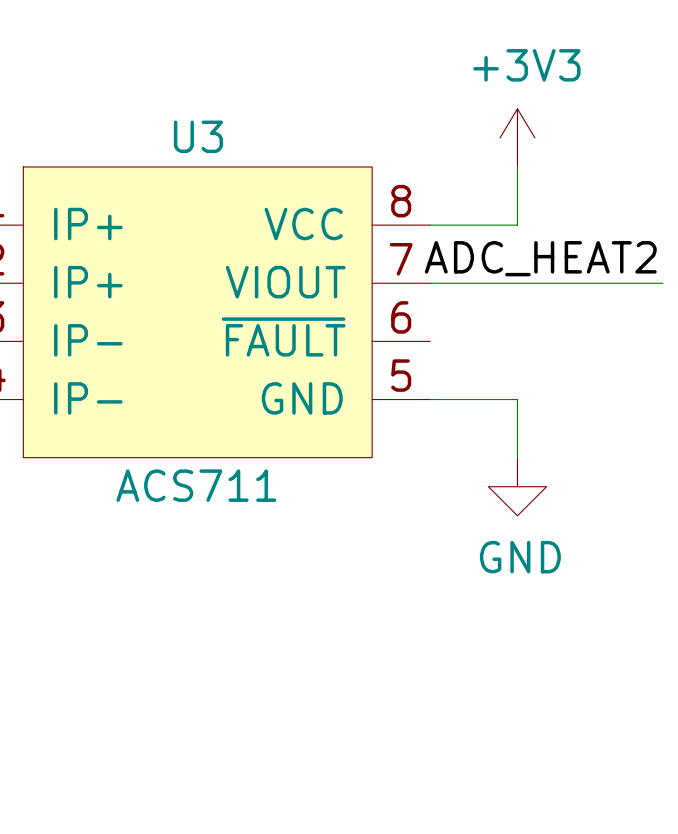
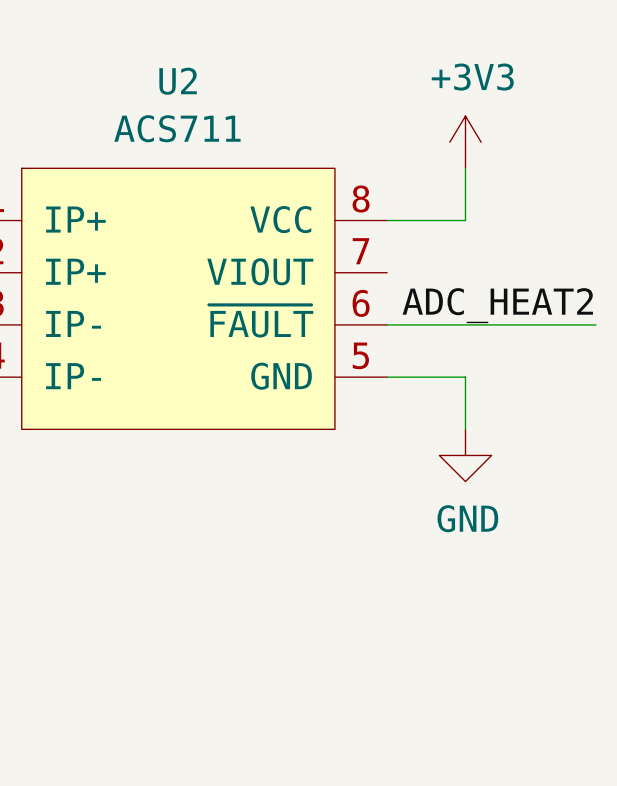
U3 name: U3 (198, 136) -> U2 (178, 81)
label position: ADC_HEAT2 (540, 258) -> ADC_HEAT2 (497, 305)
wire: (430, 283) (662, 283) -> (387, 324) (596, 324)
U3 value position: ACS711 (196, 485) -> ACS711 (177, 128)

